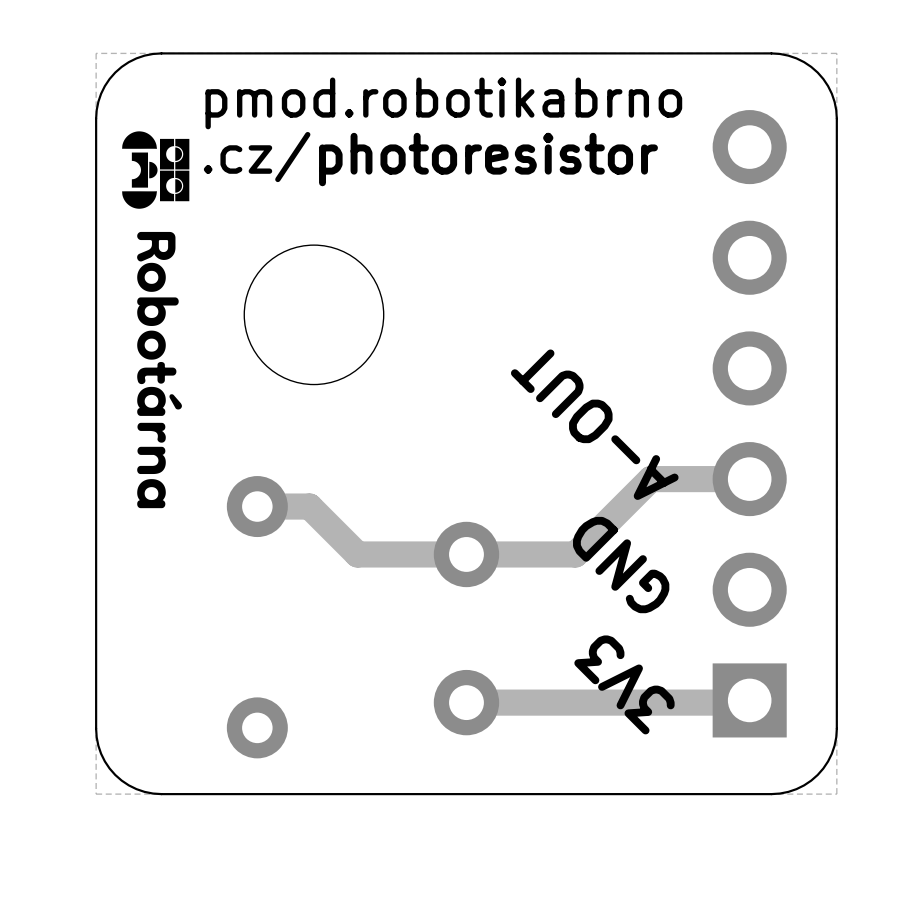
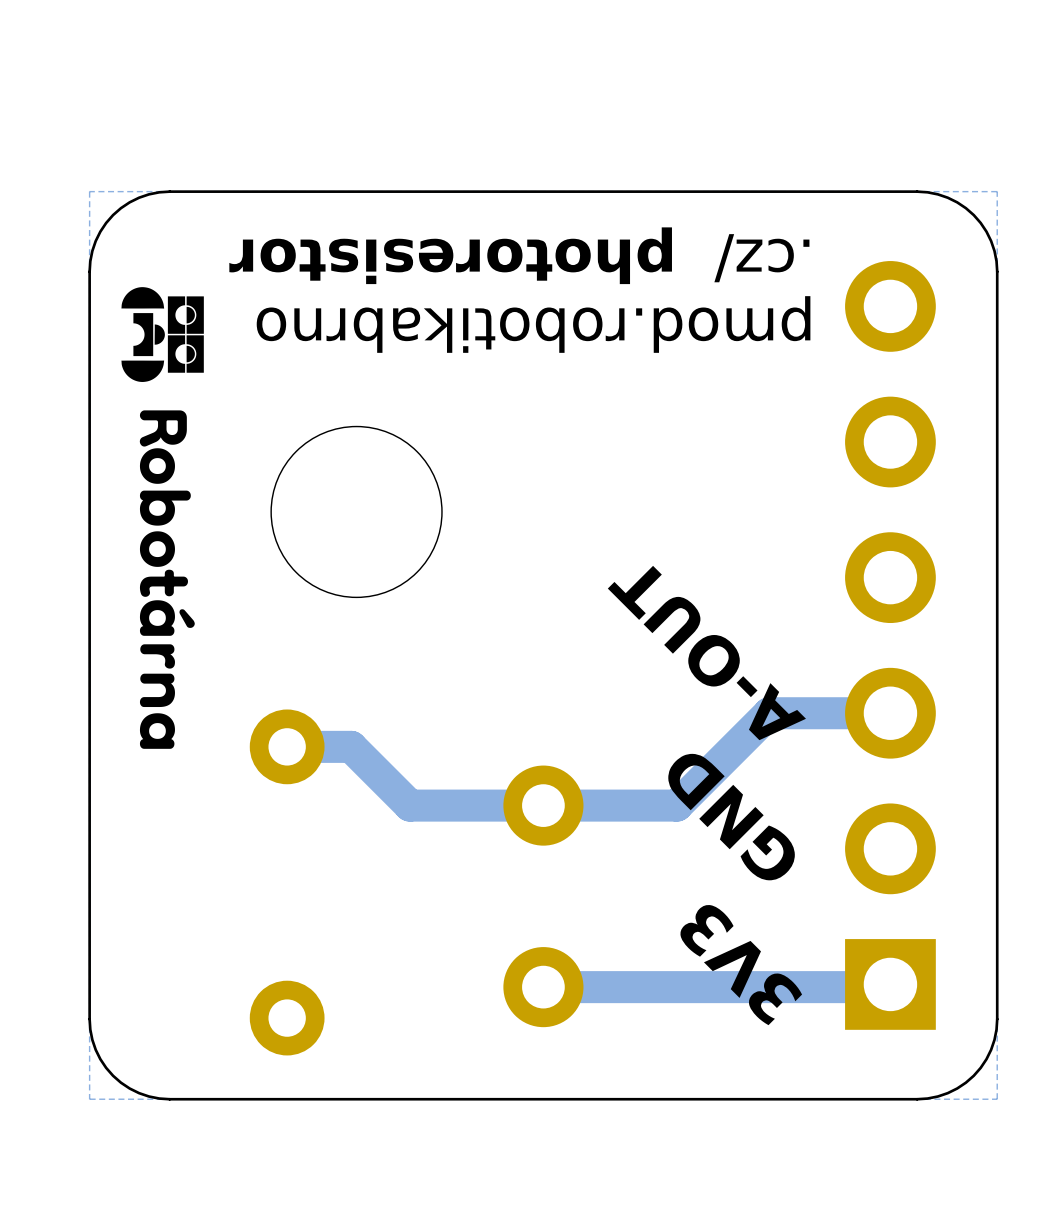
text rotation: 0° (443, 103) -> 180° (533, 324)
text rotation: 0° (257, 157) -> 180° (761, 258)
text position: .cz/ (257, 157) -> .cz/ (761, 258)
text rotation: 0° (488, 159) -> 180° (450, 255)

